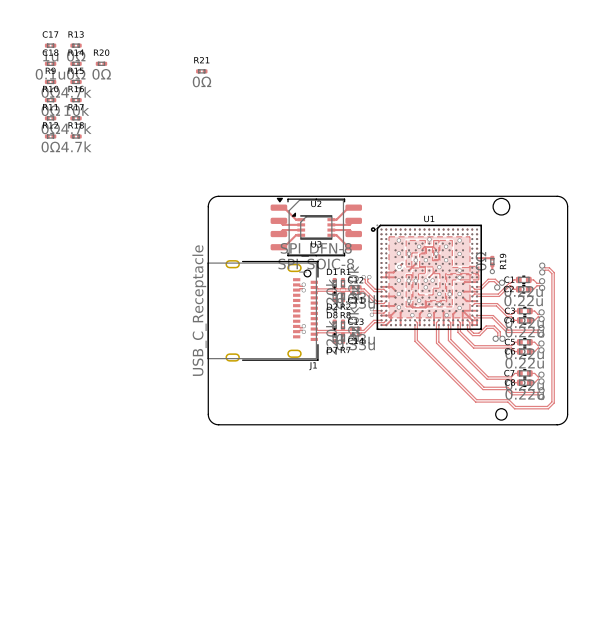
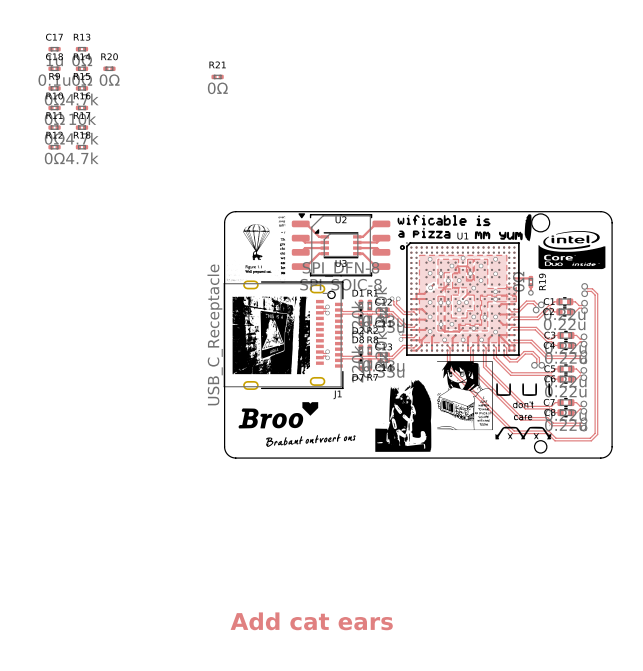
drawing: none -> [397, 214, 606, 270]
drawing: none -> [225, 216, 286, 283]
drawing: none -> [232, 296, 311, 375]
drawing: none -> [375, 361, 552, 452]
drawing: none -> [238, 402, 356, 447]
text: none -> Add cat ears (311, 621)

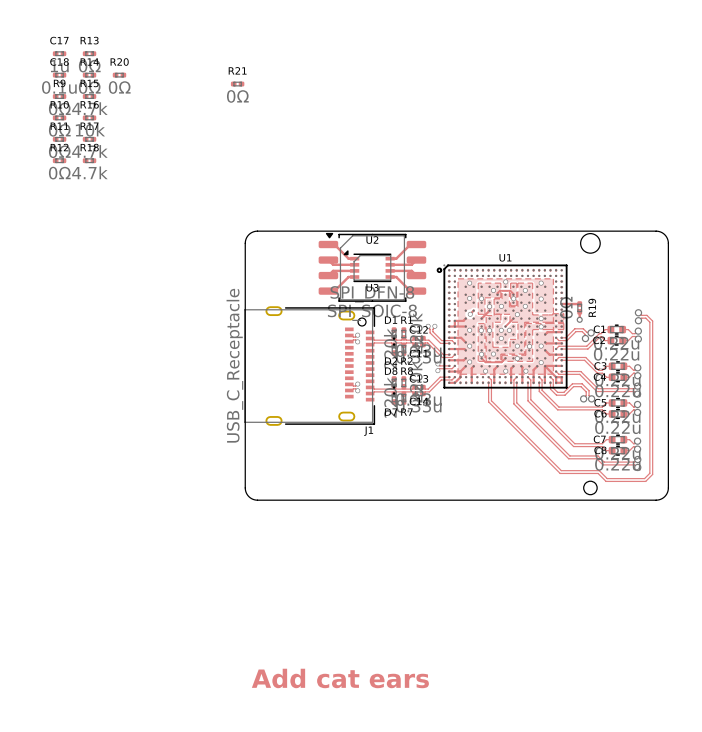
drawing: [397, 214, 606, 270] -> none
drawing: [225, 216, 286, 283] -> none
drawing: [232, 296, 311, 375] -> none
drawing: [375, 361, 552, 452] -> none
drawing: [238, 402, 356, 447] -> none

